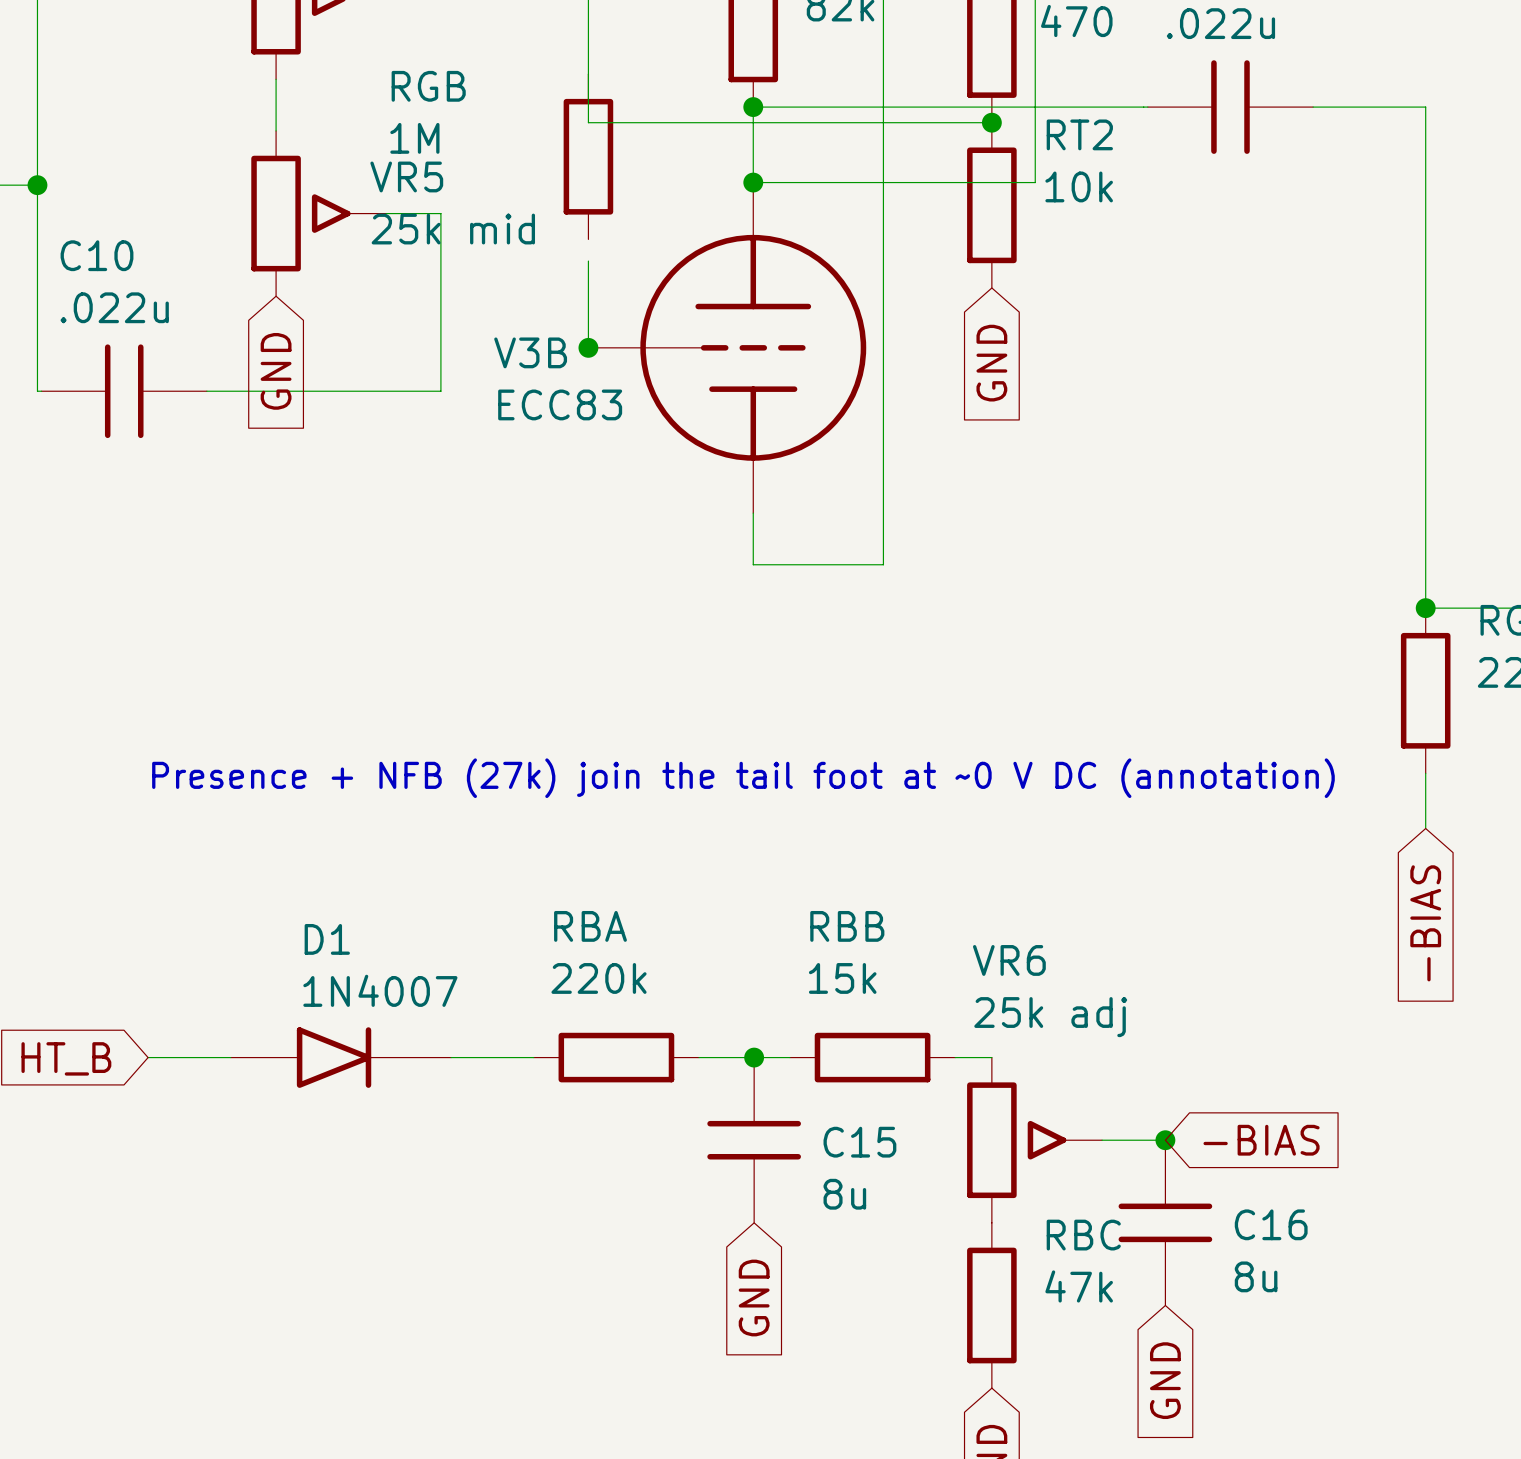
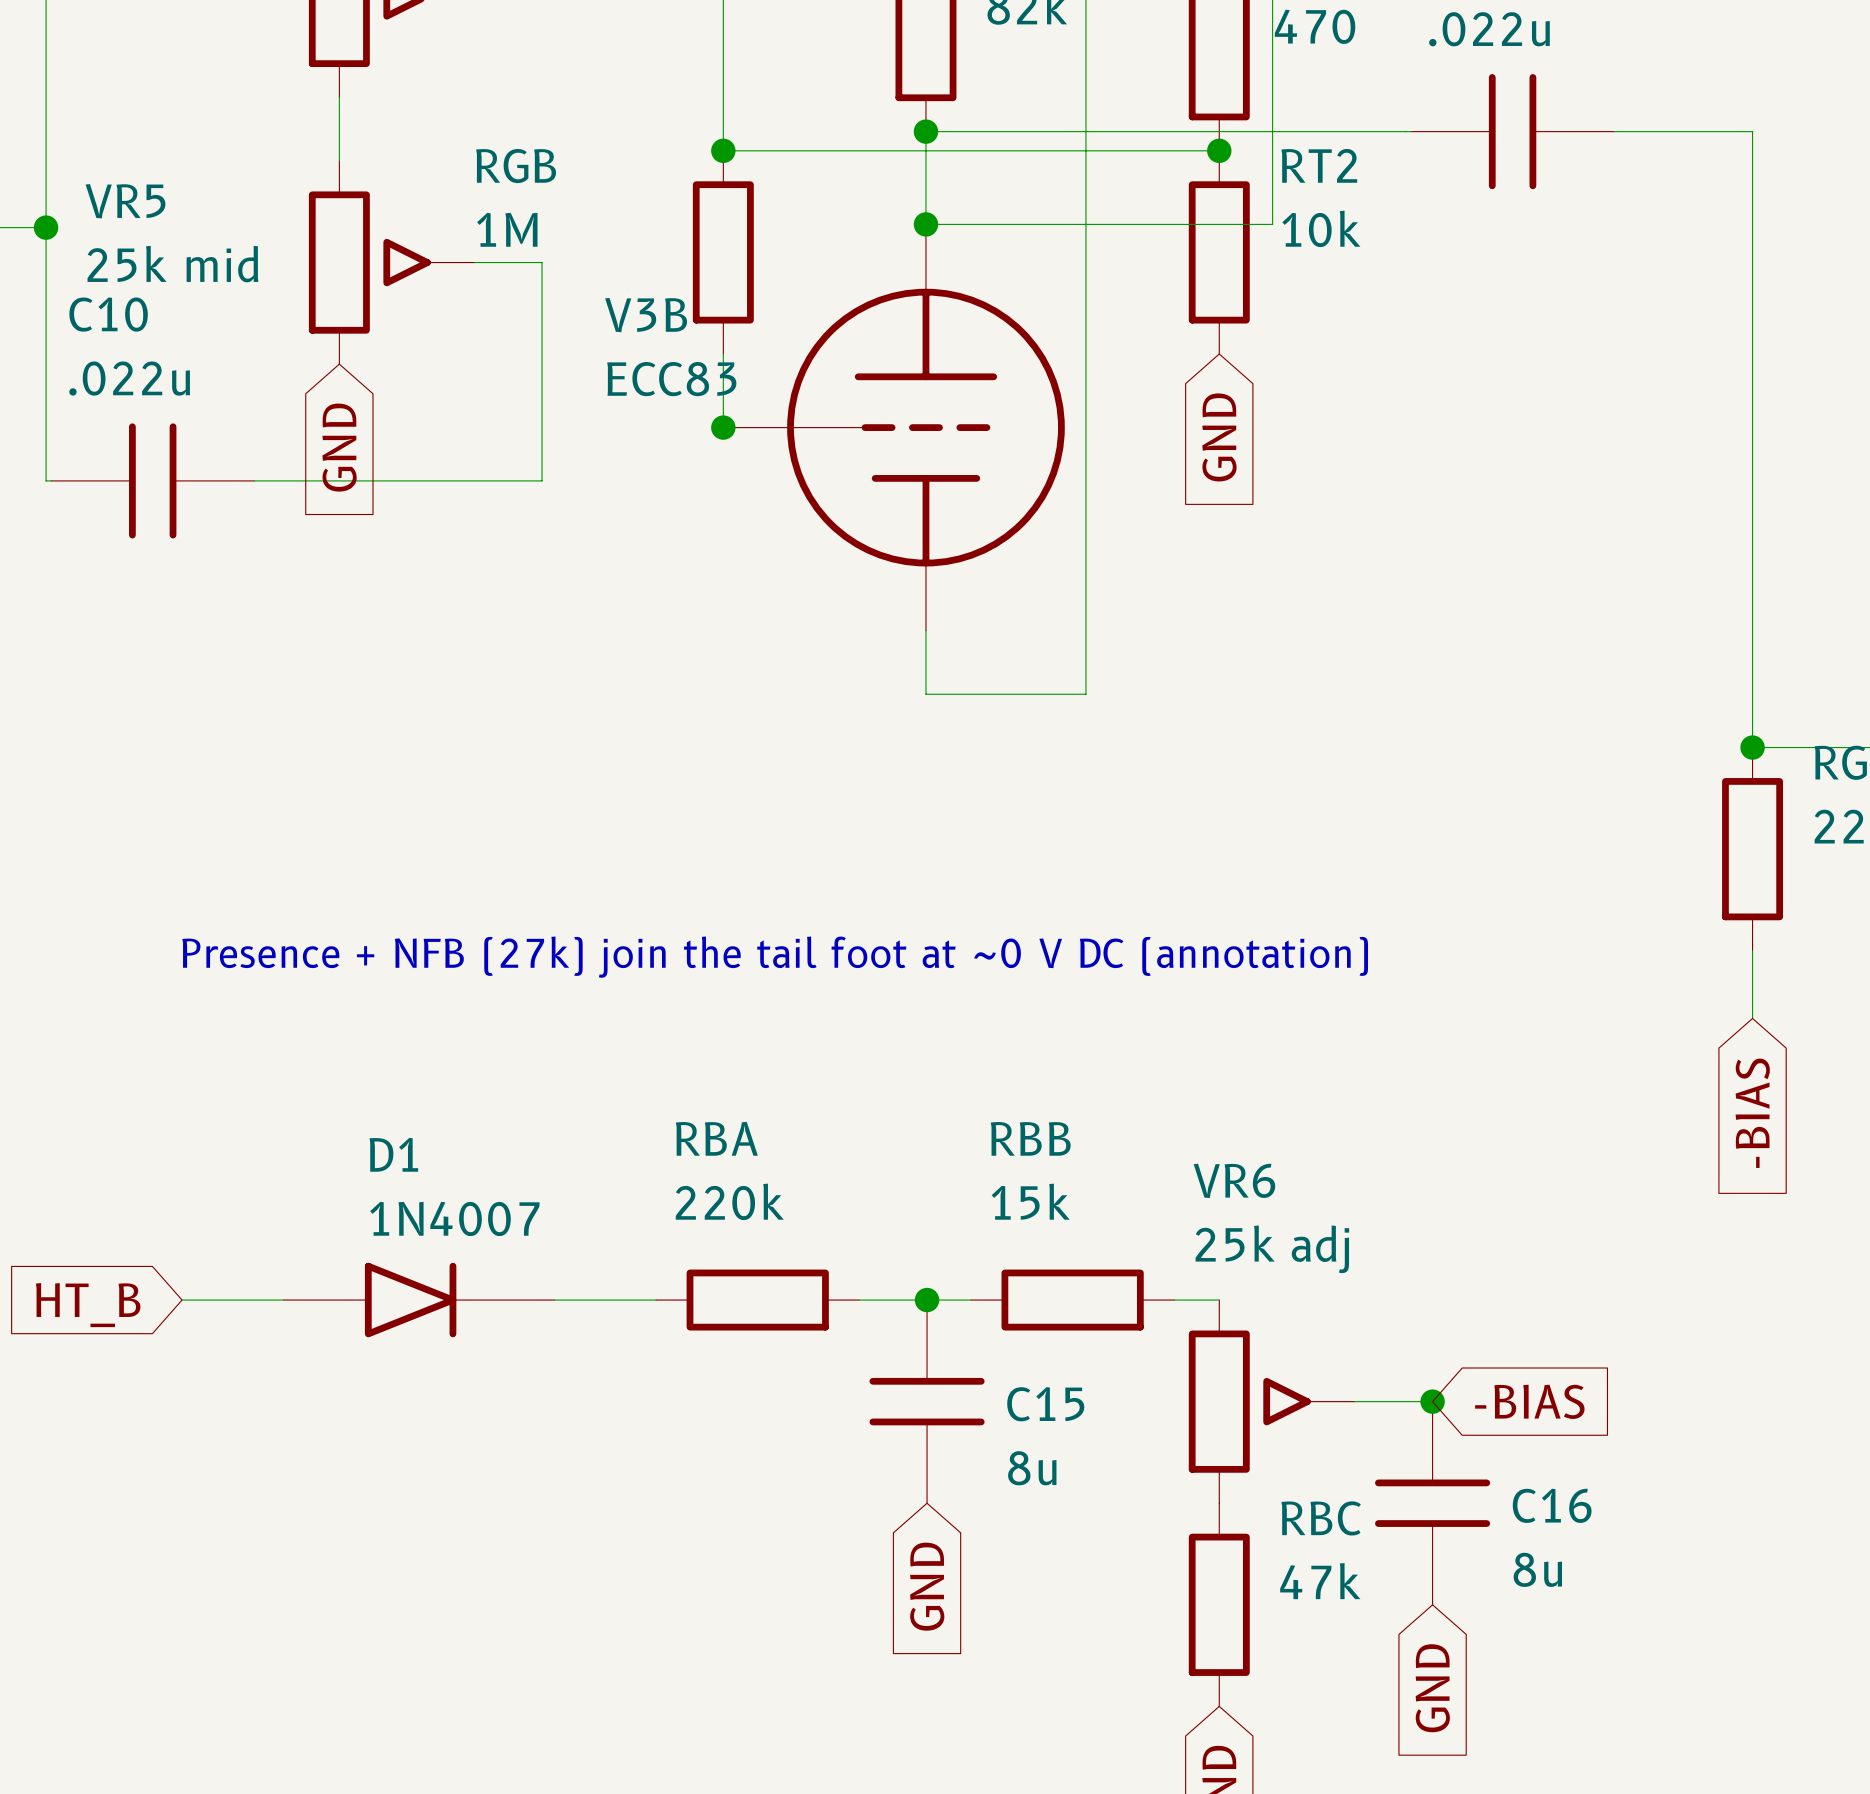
junction: none -> (723, 150)
RGB position: (588, 156) -> (723, 252)
VR5 name position: VR5 (406, 176) -> VR5 (125, 201)
VR5 value position: 25k mid (453, 229) -> 25k mid (172, 264)
V3B name position: V3B (530, 352) -> V3B (646, 315)
V3B value position: ECC83 (560, 404) -> ECC83 (671, 379)

